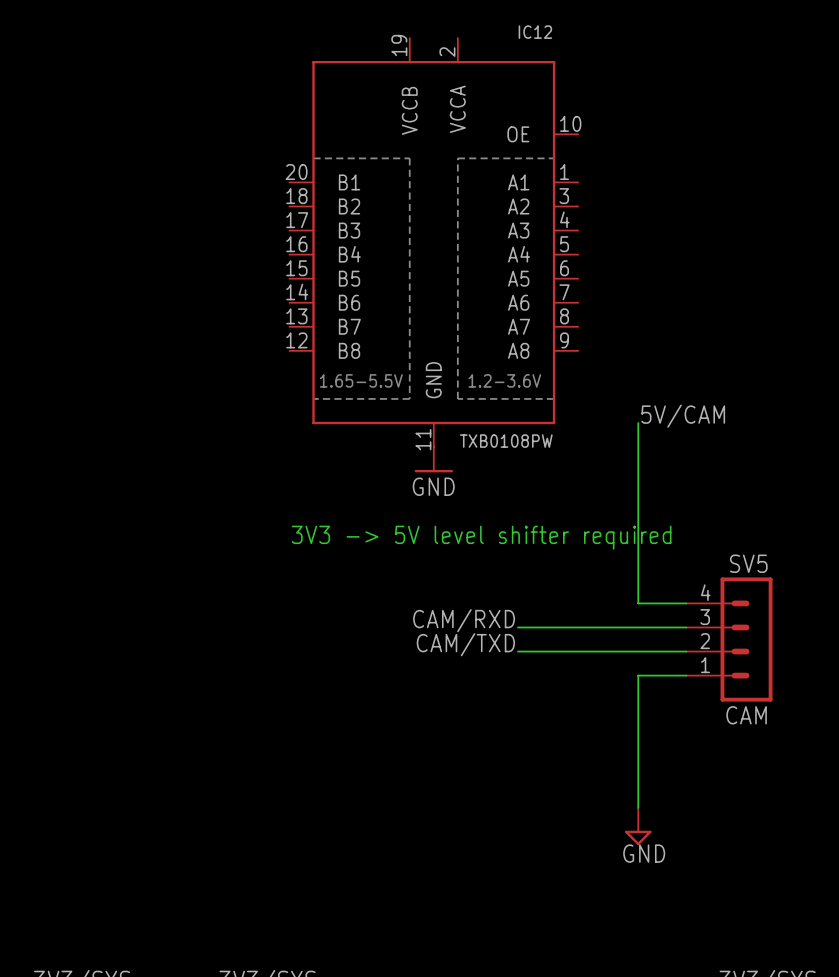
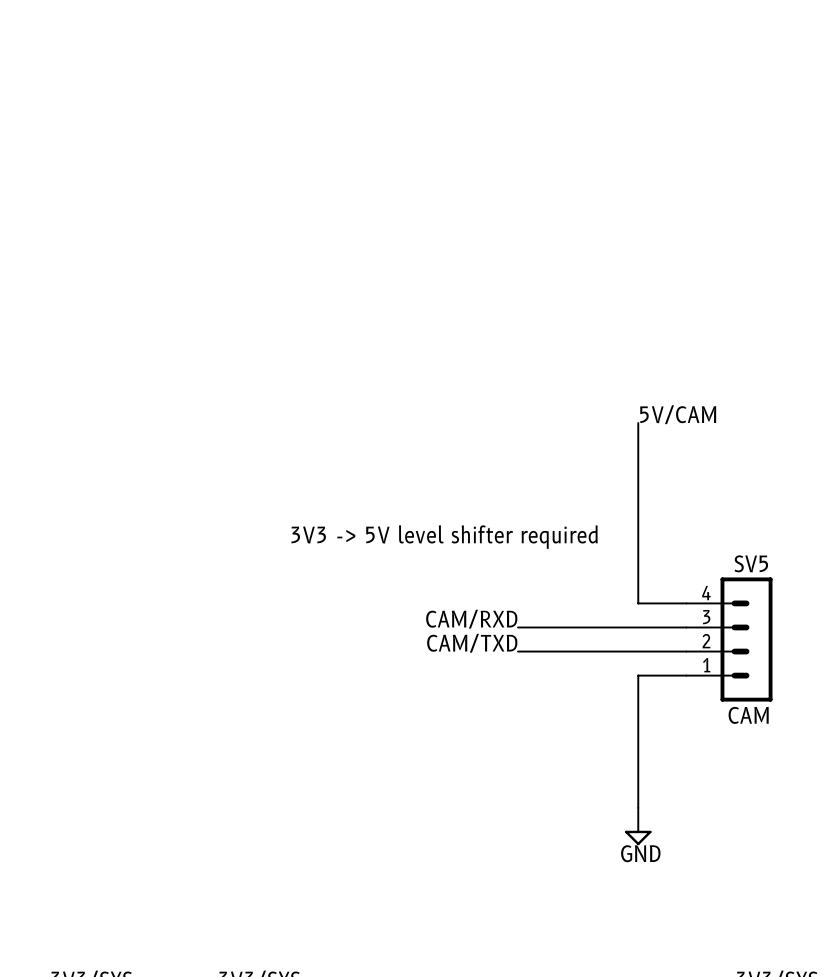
IC12: TXB0108PW (433, 242) -> none
power symbol: GND (433, 459) -> none

